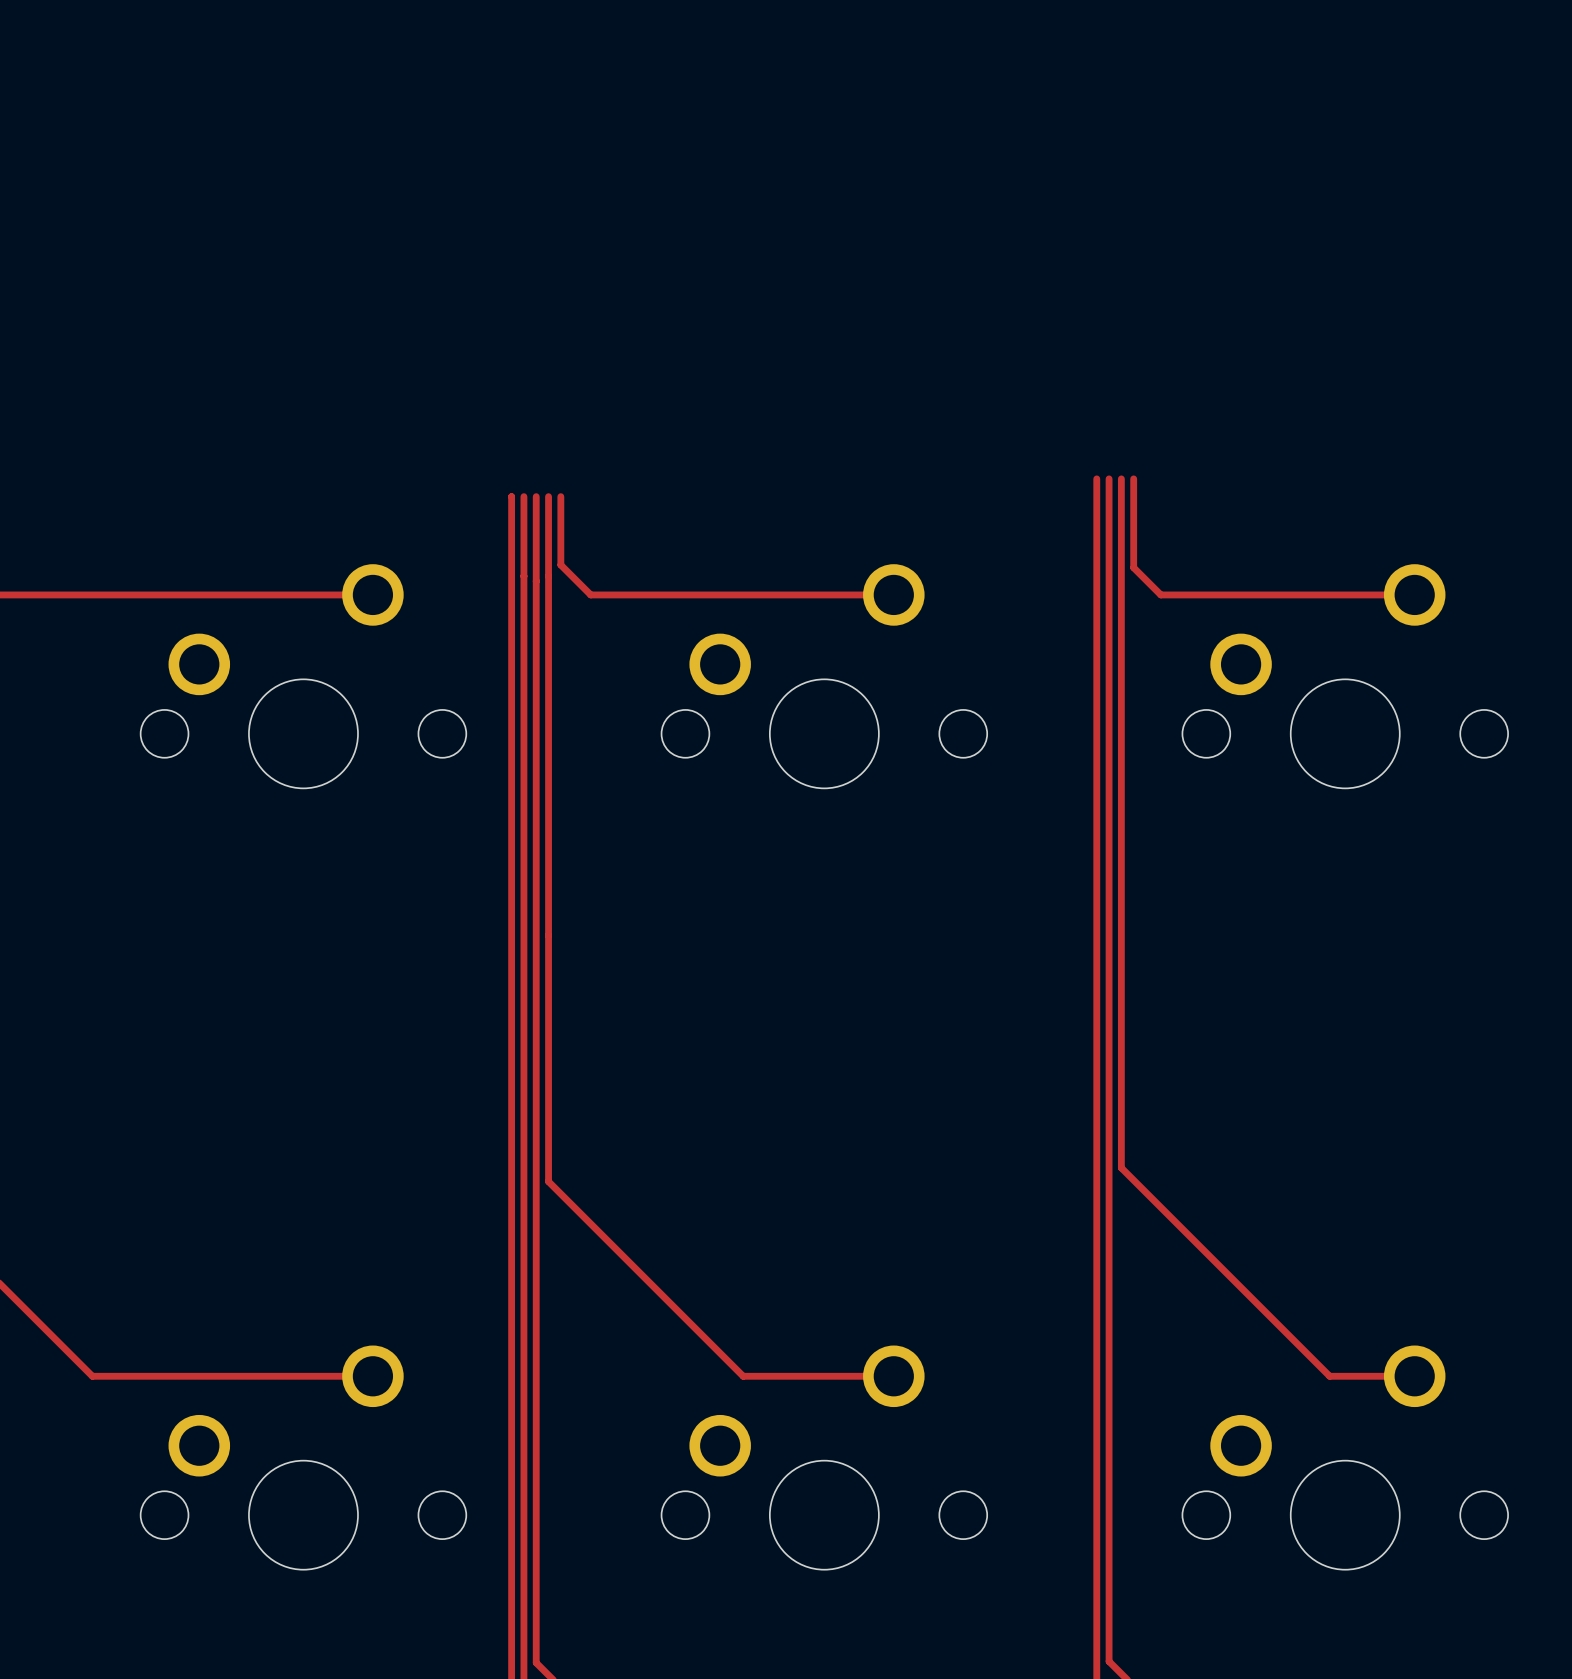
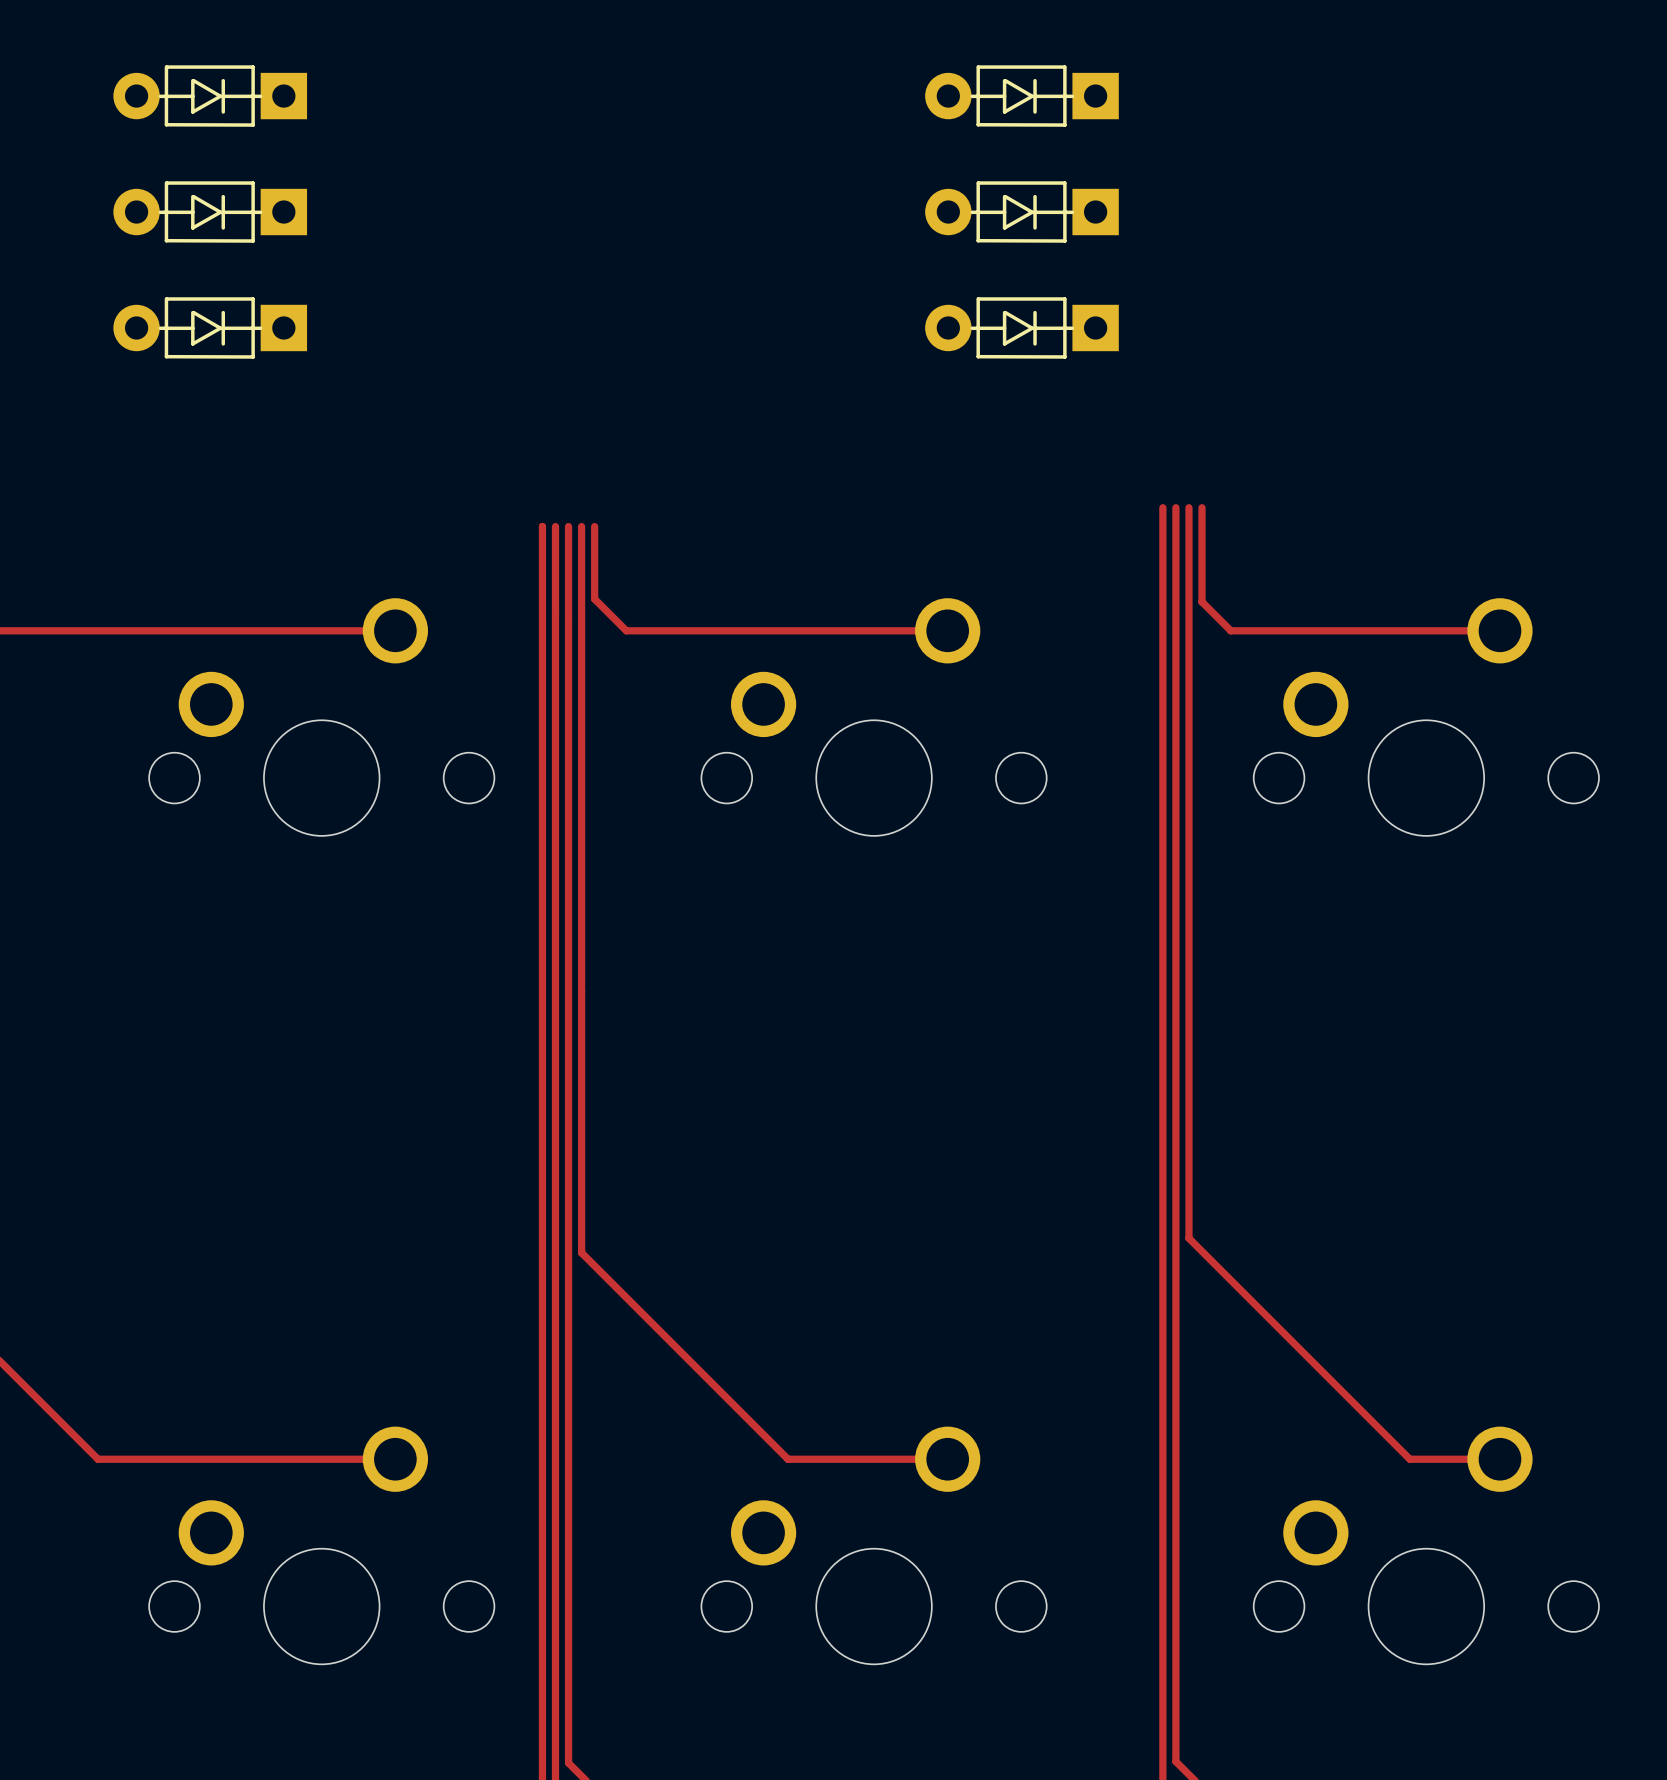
part: none -> (210, 96)
part: none -> (1021, 96)
part: none -> (210, 212)
part: none -> (1021, 212)
part: none -> (210, 327)
part: none -> (1021, 327)

